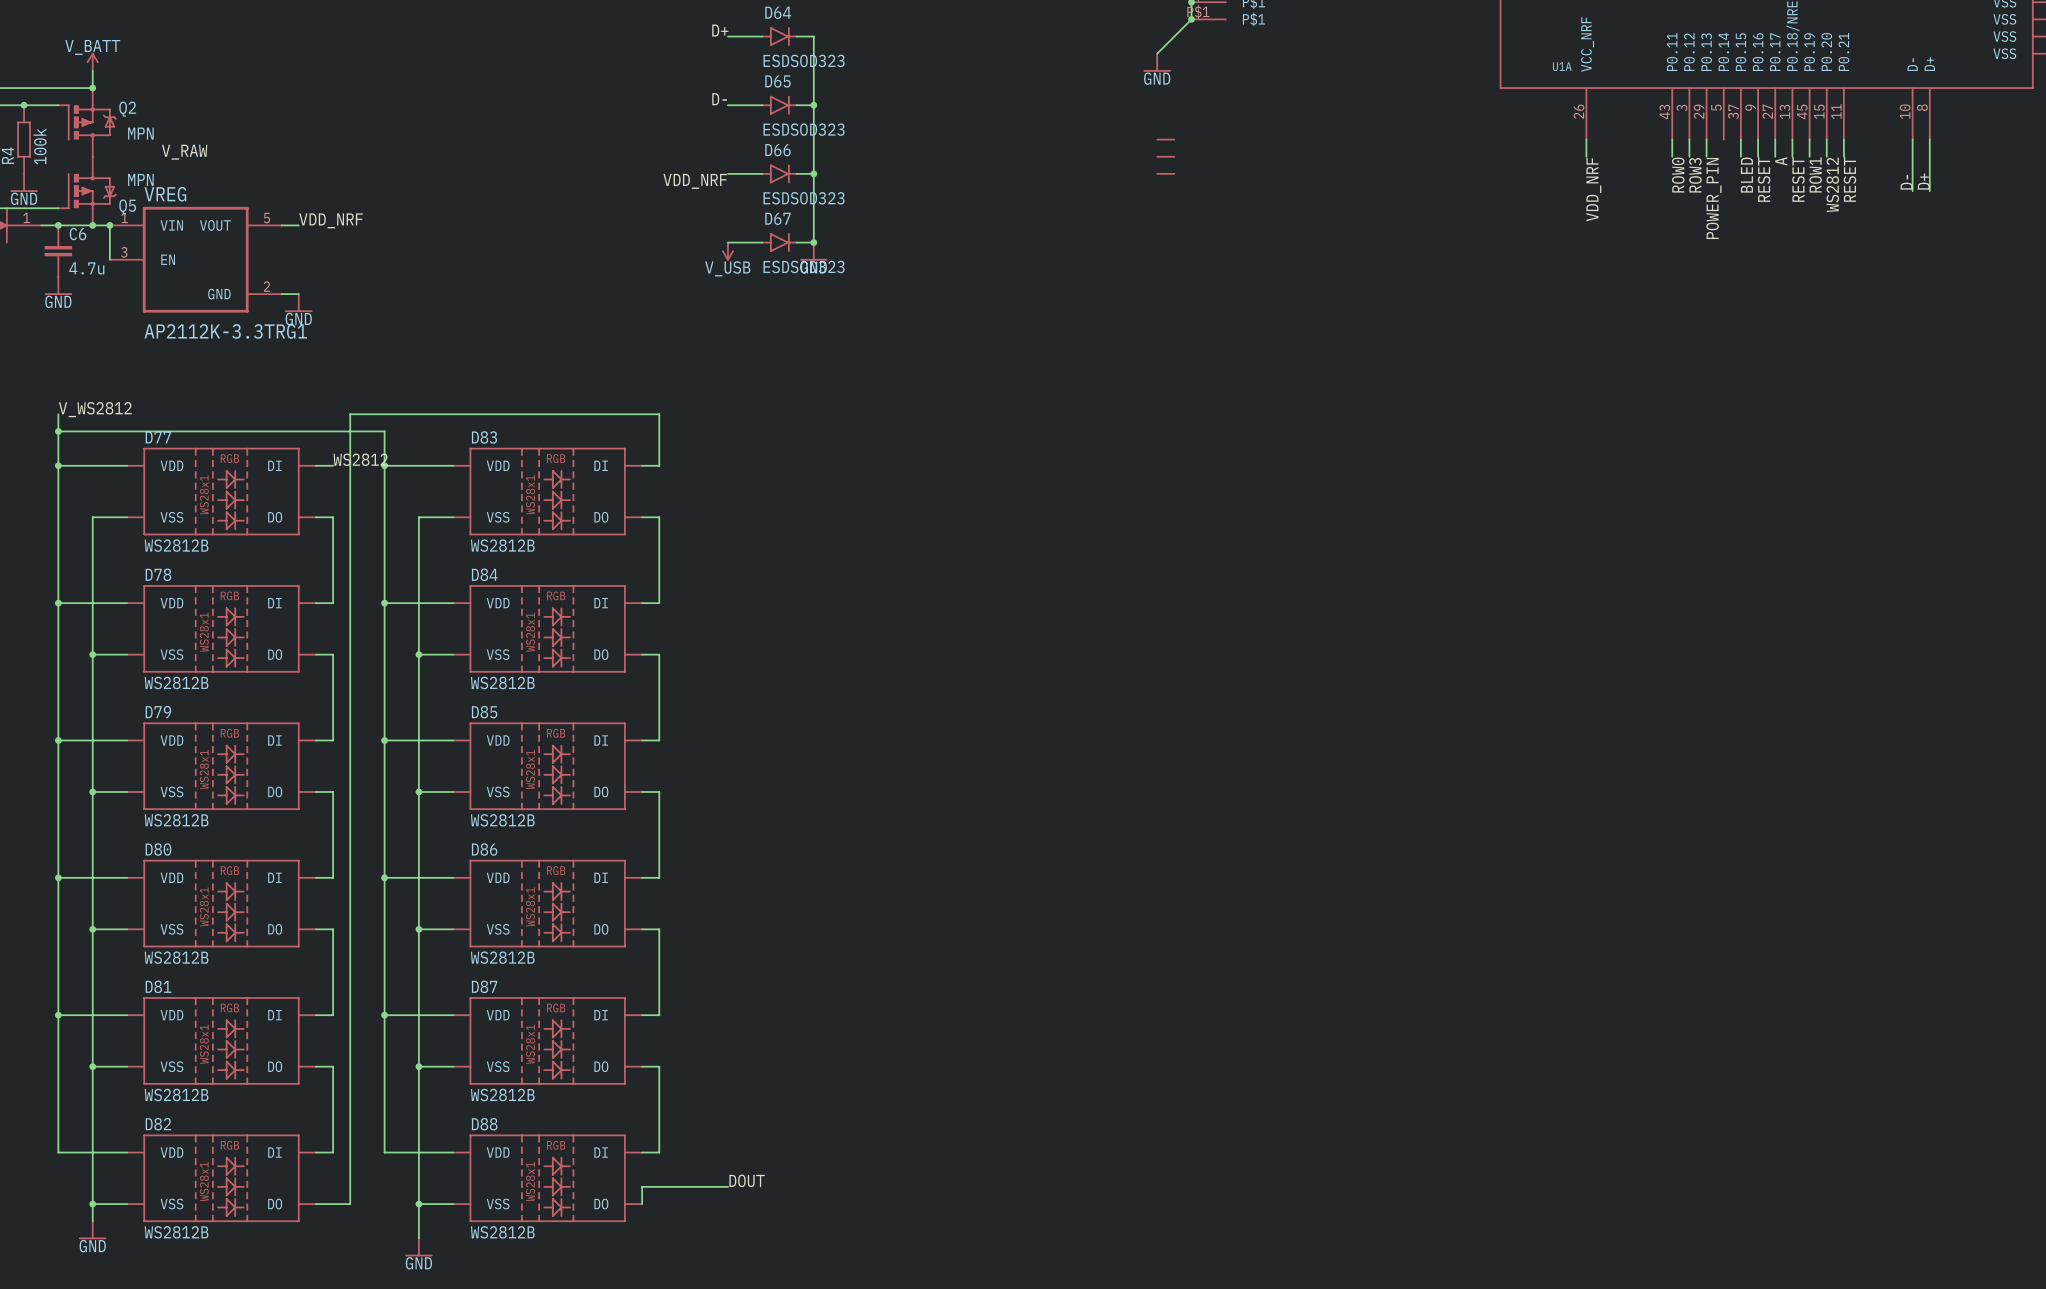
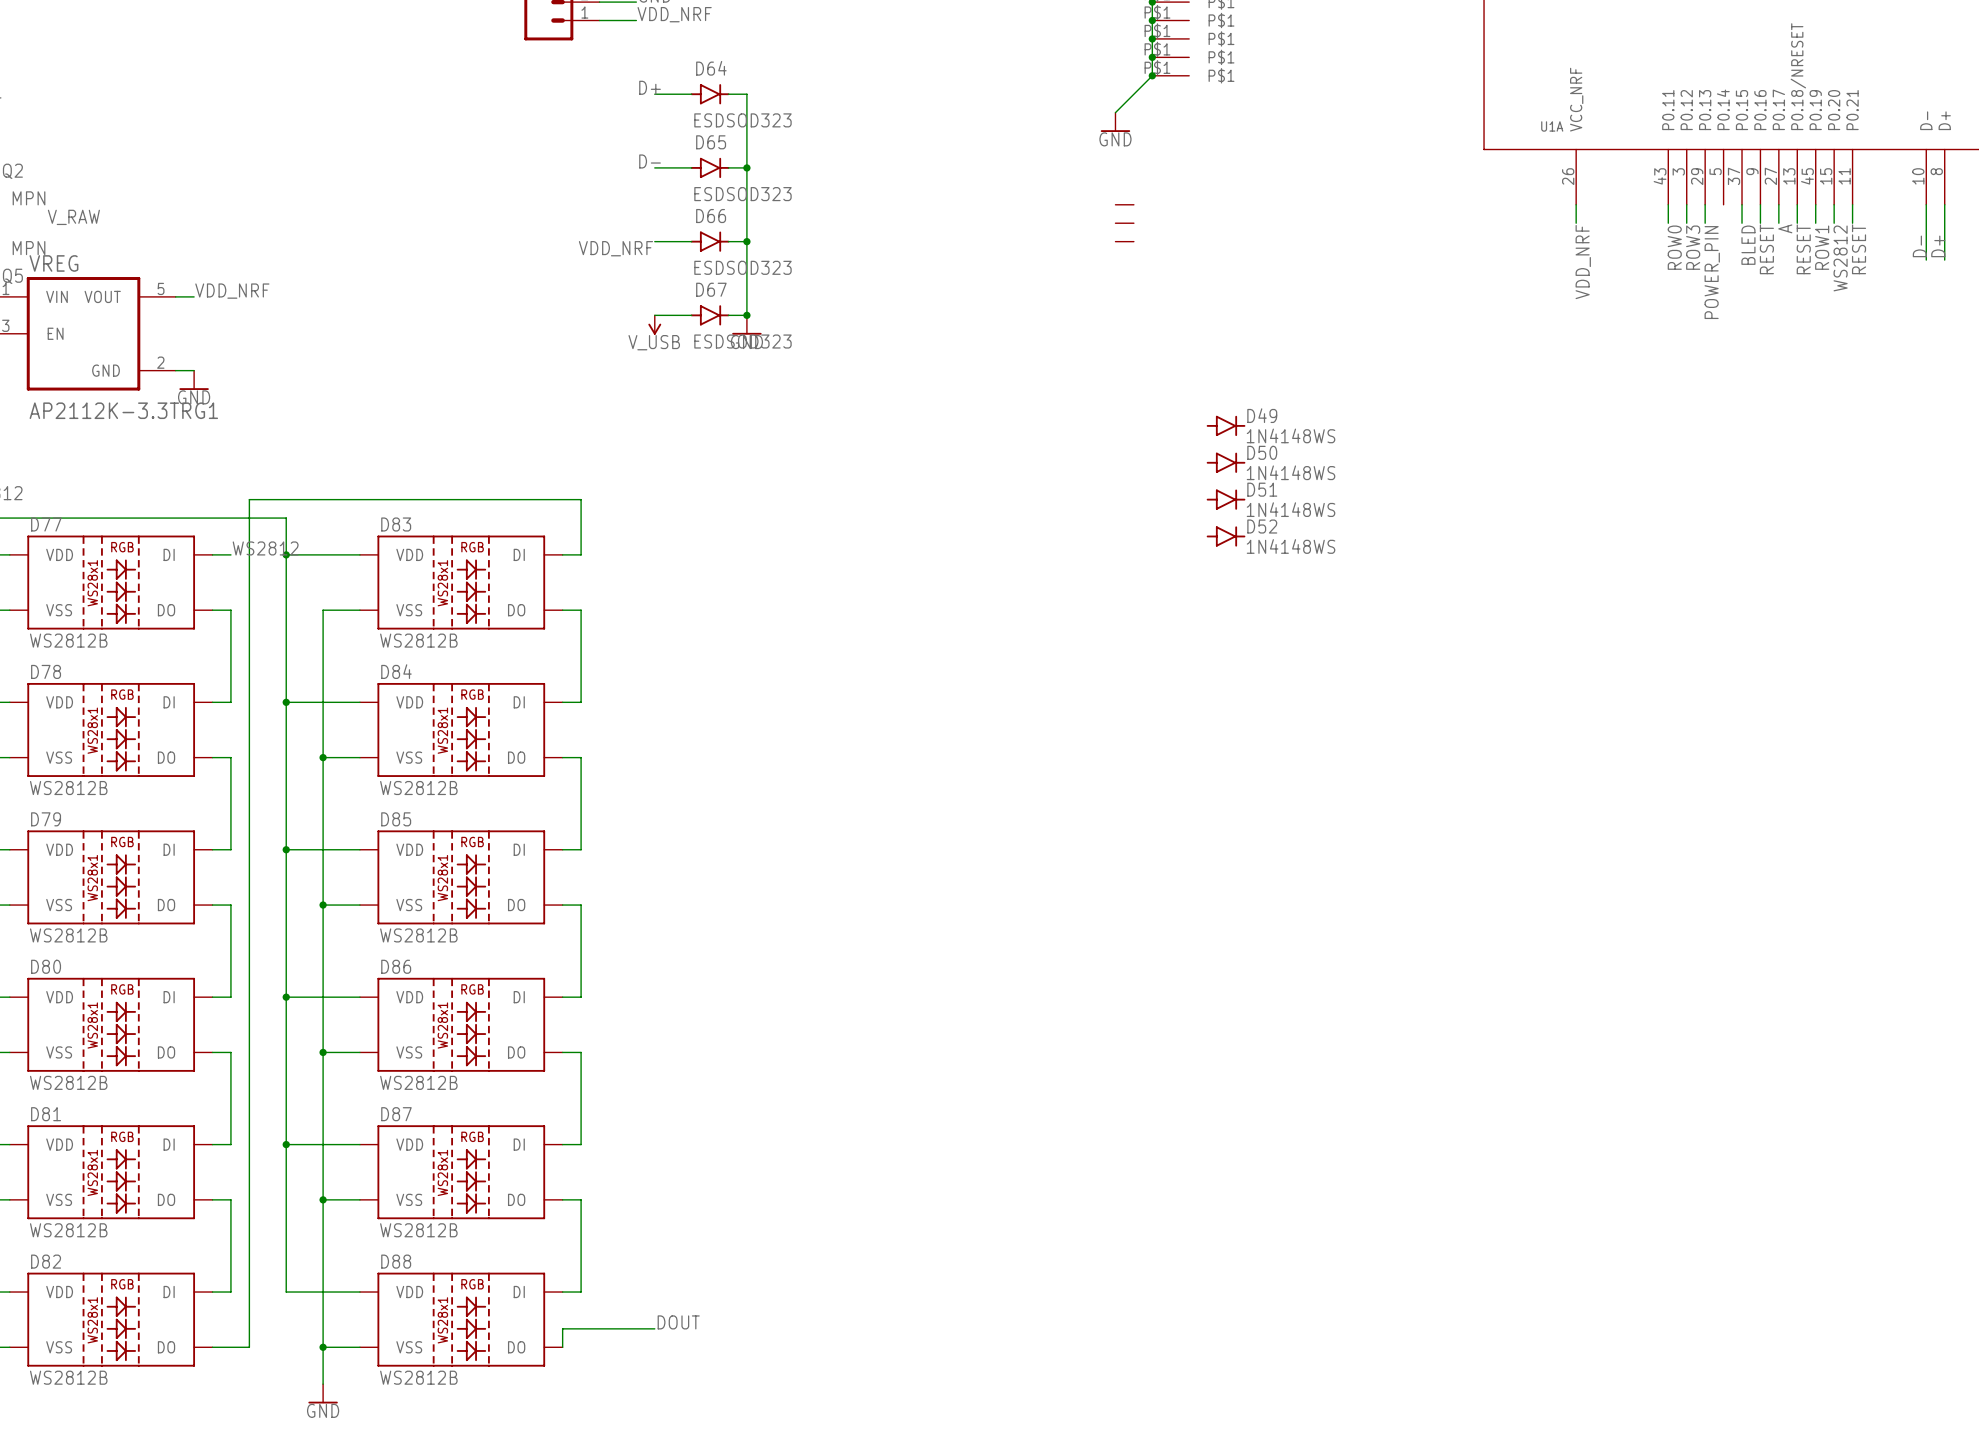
D49: none -> 1N4148WS (1226, 425)
D50: none -> 1N4148WS (1226, 462)
D51: none -> 1N4148WS (1226, 499)
D52: none -> 1N4148WS (1226, 536)

